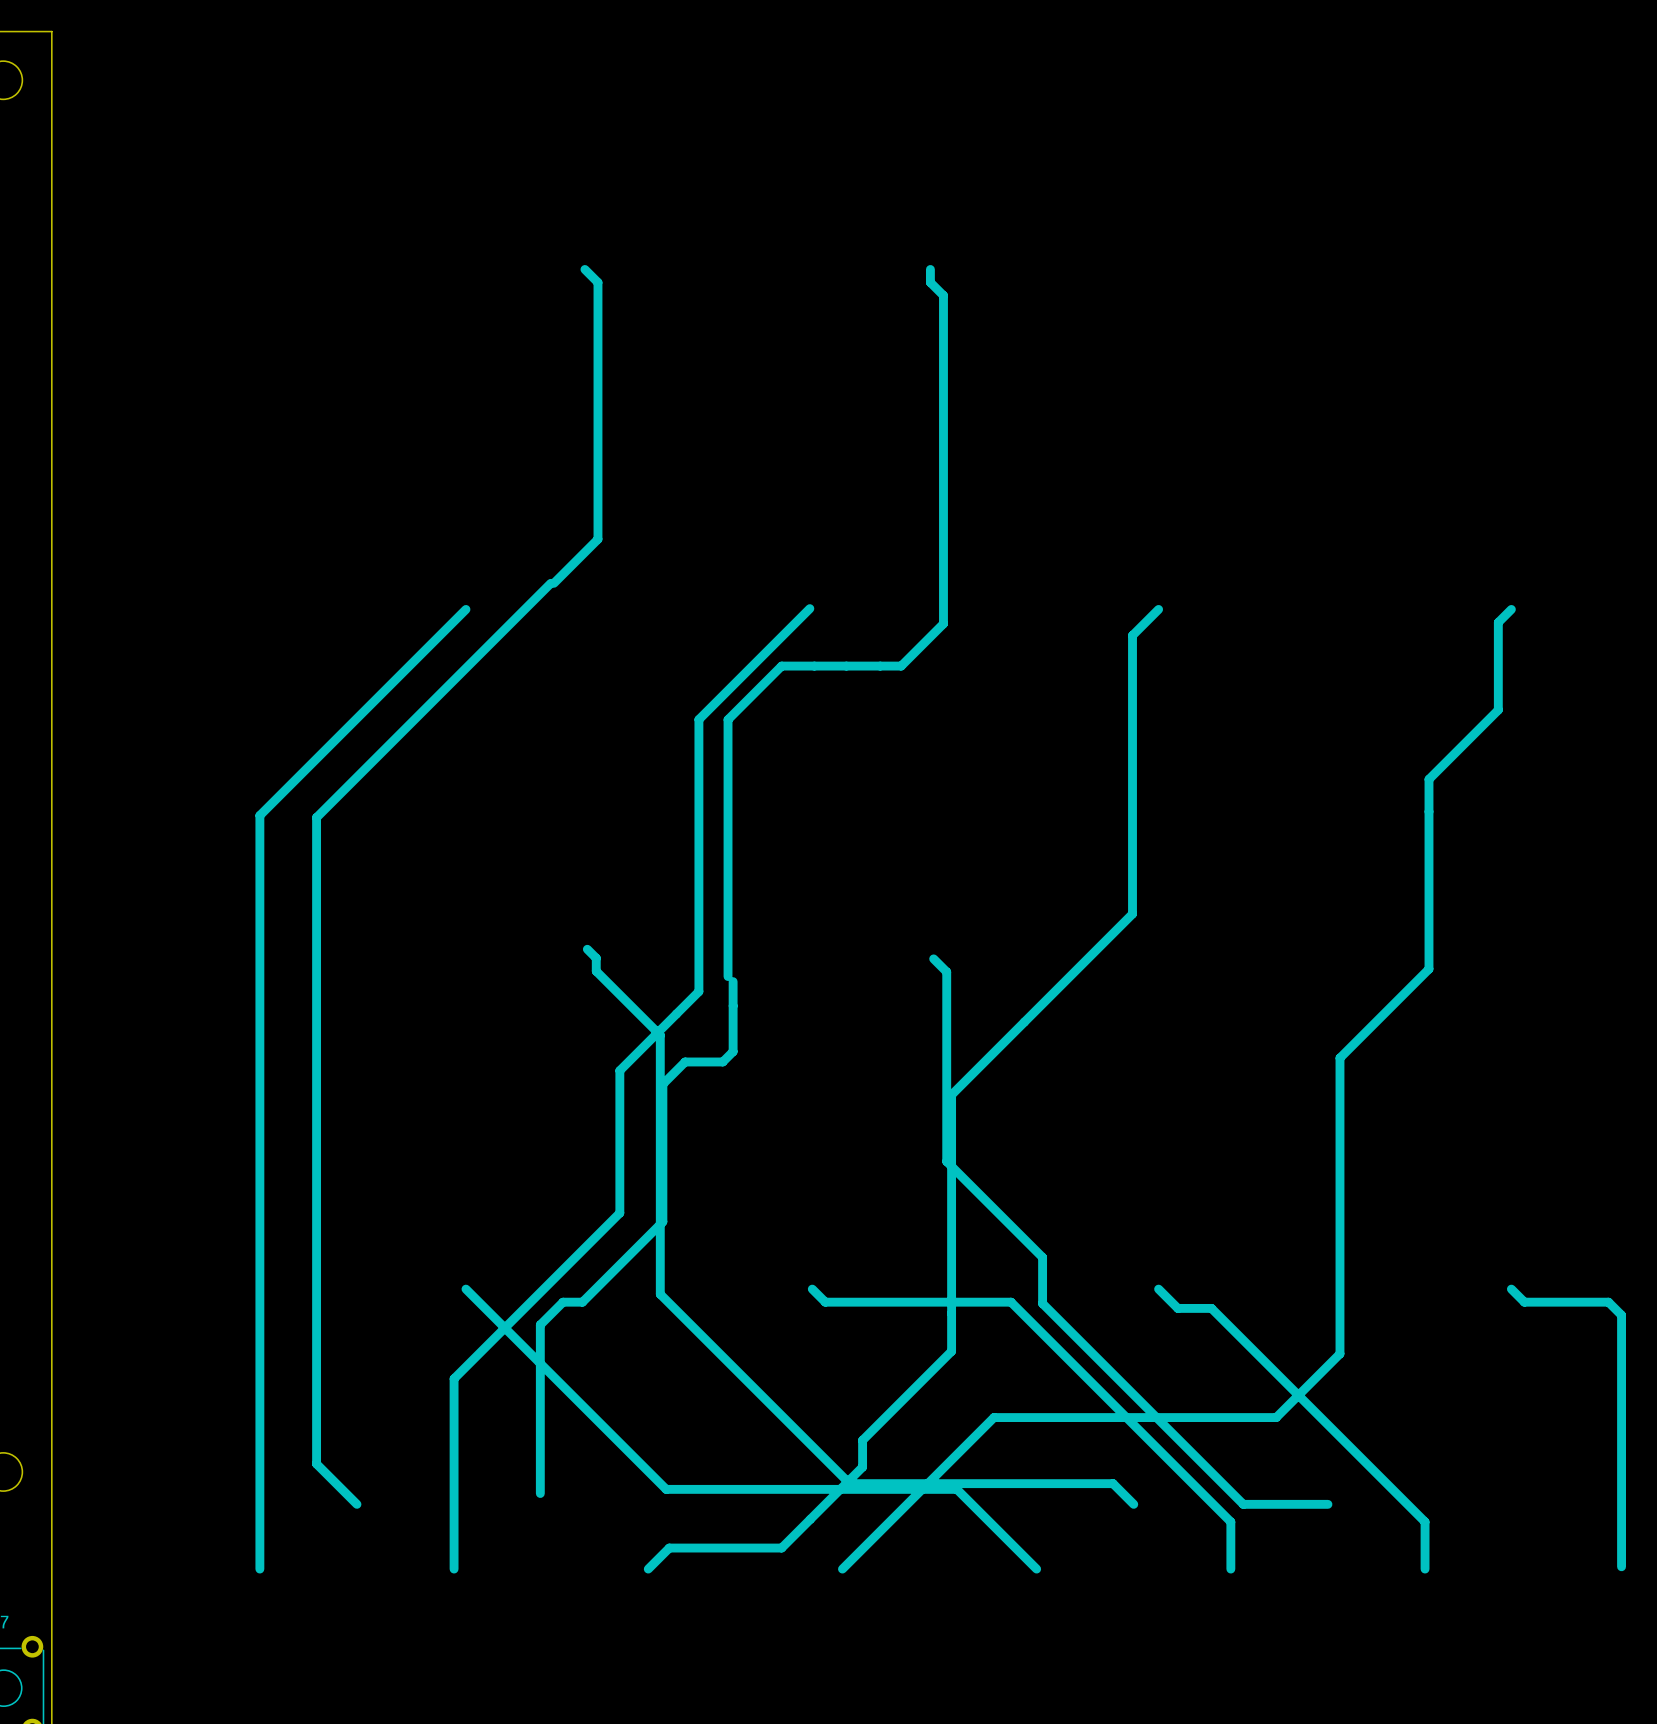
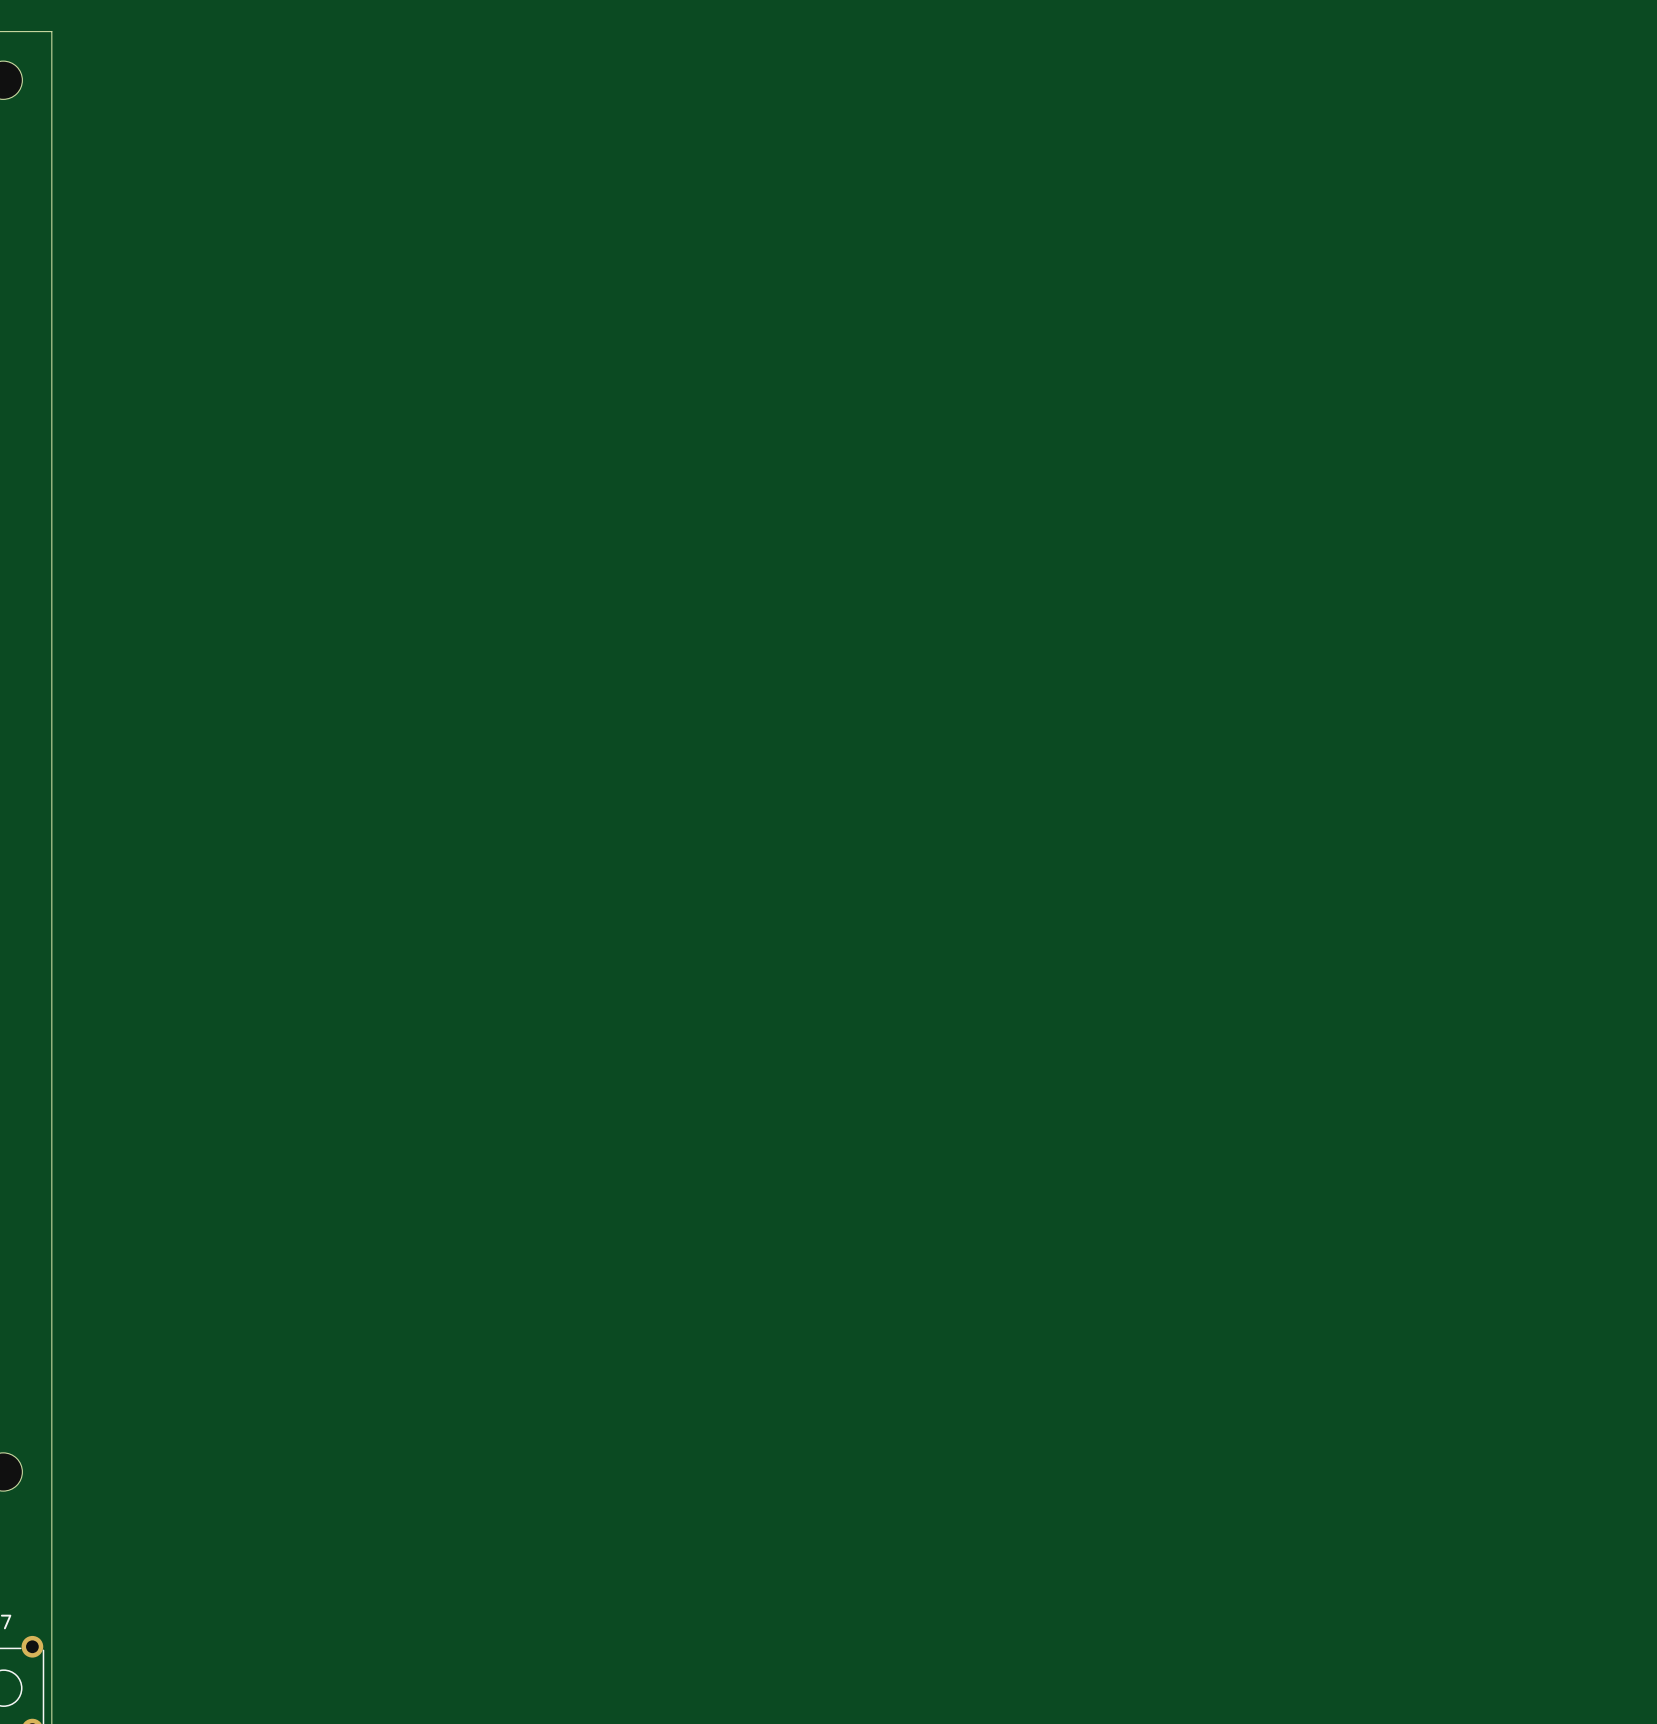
line: (584, 269) (597, 282) (597, 539) (553, 583) -> none
line: (930, 269) (930, 282) (943, 295) (943, 623) (901, 666) (781, 666) (728, 719) (728, 976) -> none
line: (550, 583) (316, 817) (316, 1463) (356, 1504) -> none
line: (809, 608) (698, 719) (698, 991) (619, 1070) (619, 1213) (454, 1378) (454, 1569) -> none
line: (465, 609) (259, 815) (259, 1569) -> none
line: (1158, 609) (1132, 635) (1132, 914) (951, 1094) (951, 1351) (862, 1440) (862, 1467) (781, 1548) (669, 1548) (648, 1569) -> none
line: (1511, 609) (1498, 622) (1498, 710) (1428, 779) (1428, 969) (1339, 1058) (1339, 1353) (1276, 1417) (993, 1417) (842, 1569) -> none
line: (587, 949) (596, 958) (596, 971) (660, 1035) (660, 1294) (849, 1483) (1113, 1483) (1133, 1504) -> none
line: (933, 958) (946, 971) (946, 1161) (1042, 1257) (1042, 1303) (1243, 1504) (1327, 1504) -> none
line: (733, 981) (733, 1051) (722, 1061) (685, 1061) (662, 1084) (662, 1221) (582, 1302) (563, 1302) (540, 1324) (540, 1493) -> none
line: (465, 1289) (666, 1489) (956, 1489) (1036, 1569) -> none
line: (812, 1289) (825, 1302) (1011, 1302) (1230, 1521) (1230, 1569) -> none
line: (1158, 1289) (1177, 1308) (1211, 1308) (1425, 1521) (1425, 1569) -> none
line: (1511, 1289) (1524, 1302) (1608, 1302) (1621, 1315) (1621, 1566) -> none

